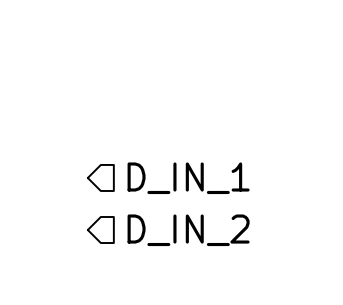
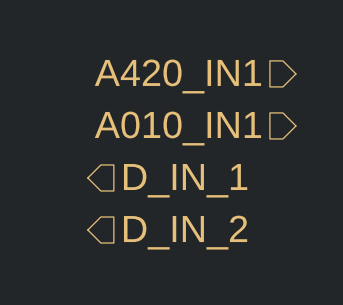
hierarchical label: none -> A420_IN1 (177, 76)
hierarchical label: none -> A010_IN1 (177, 128)

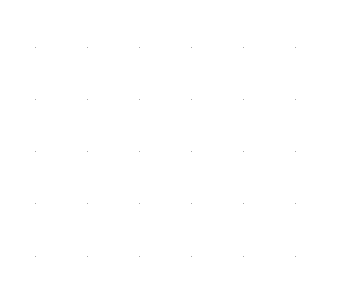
hierarchical label: A420_IN1 (177, 76) -> none
hierarchical label: A010_IN1 (177, 128) -> none
hierarchical label: D_IN_1 (185, 180) -> none
hierarchical label: D_IN_2 (185, 232) -> none

